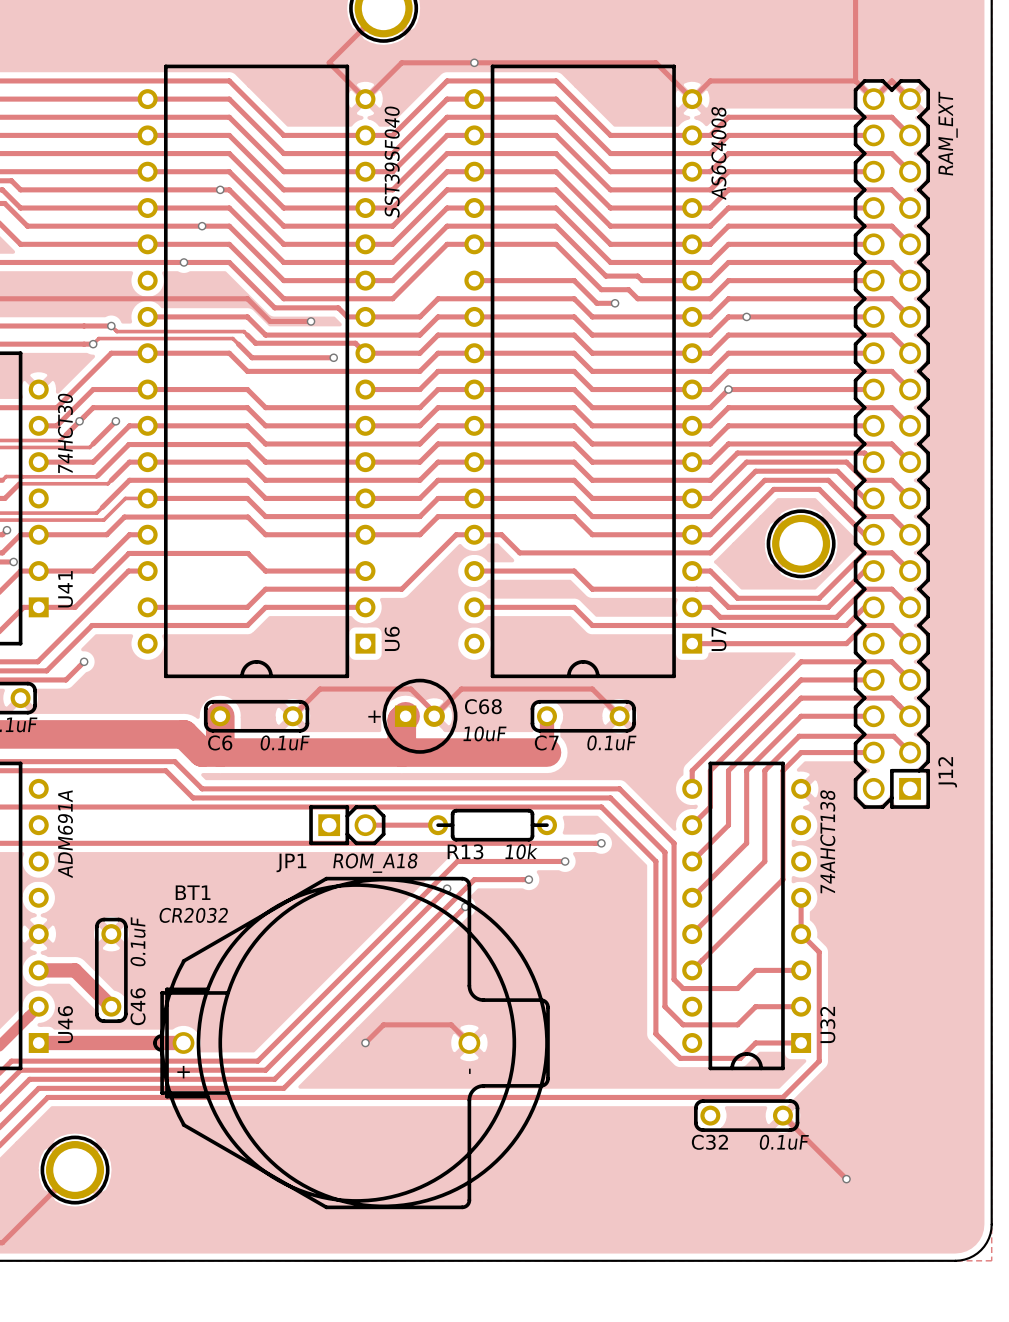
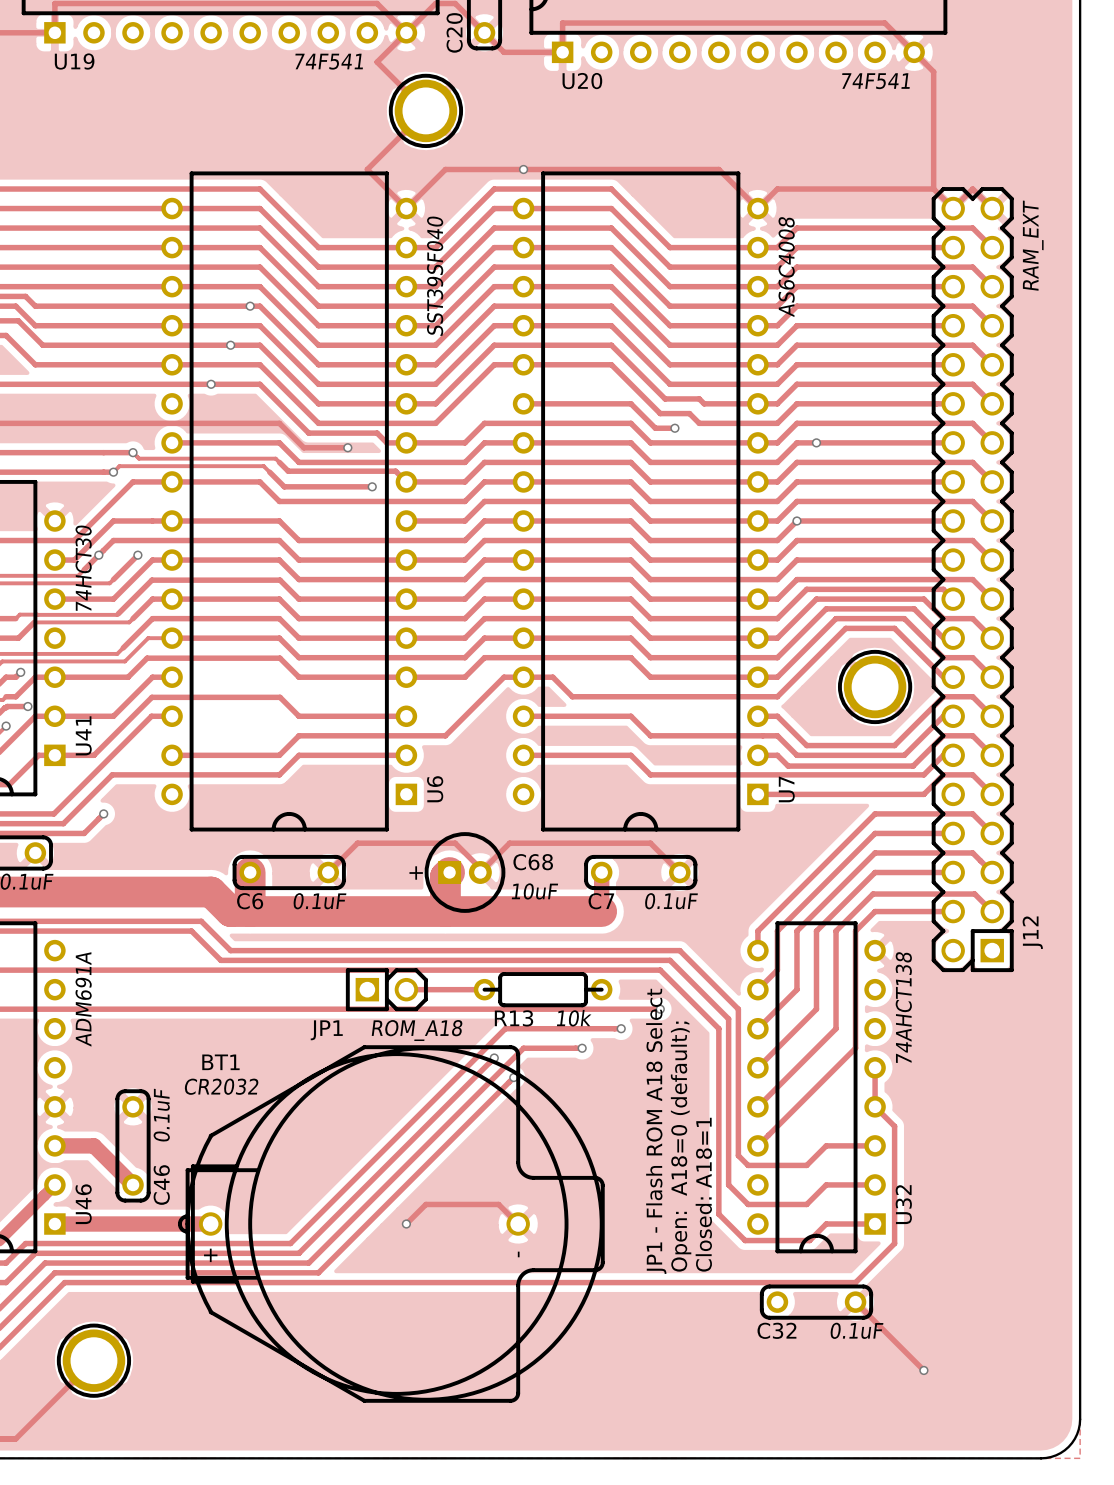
text: none -> JP1 - Flash ROM A18 Select (656, 1131)
text: none -> Open: A18=0 (default); (681, 1146)
text: none -> Closed: A18=1 (703, 1194)

